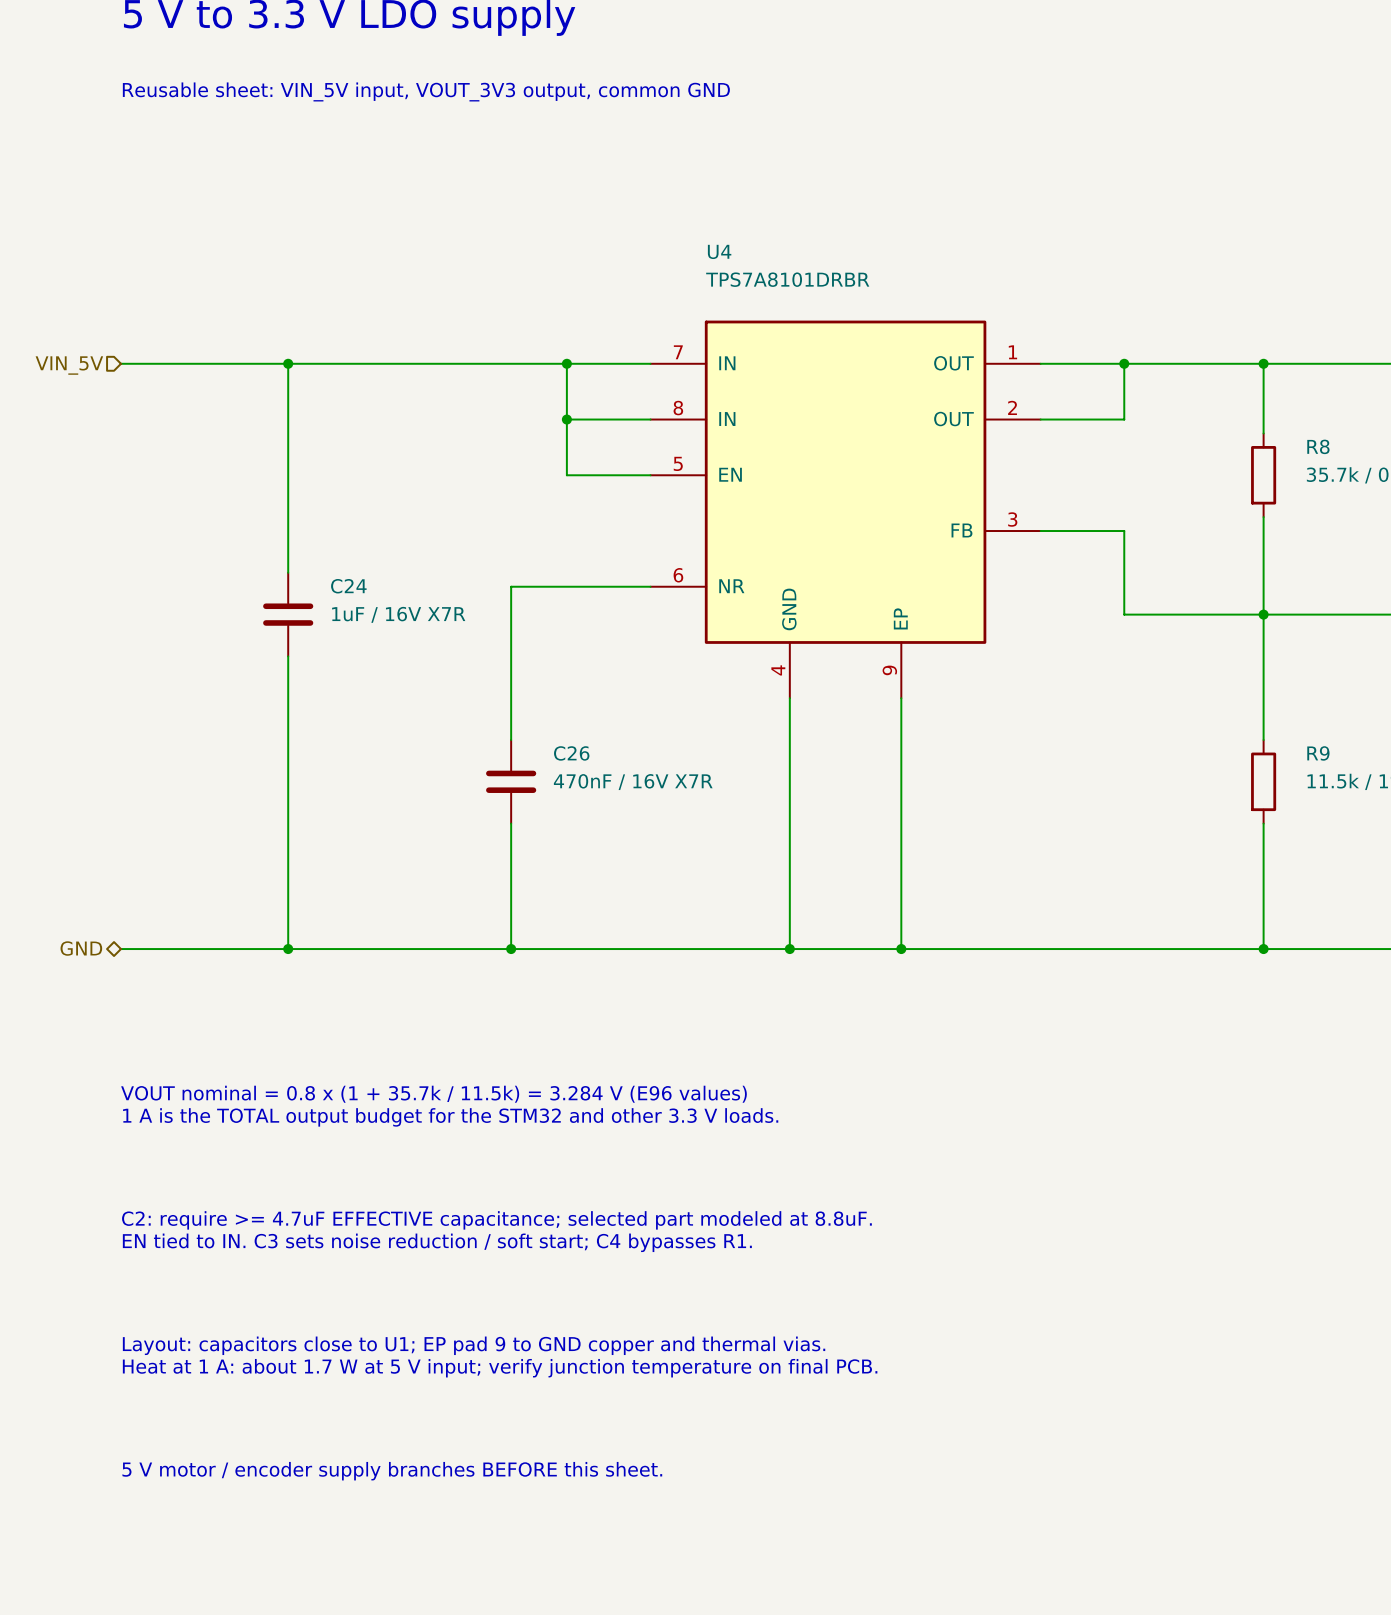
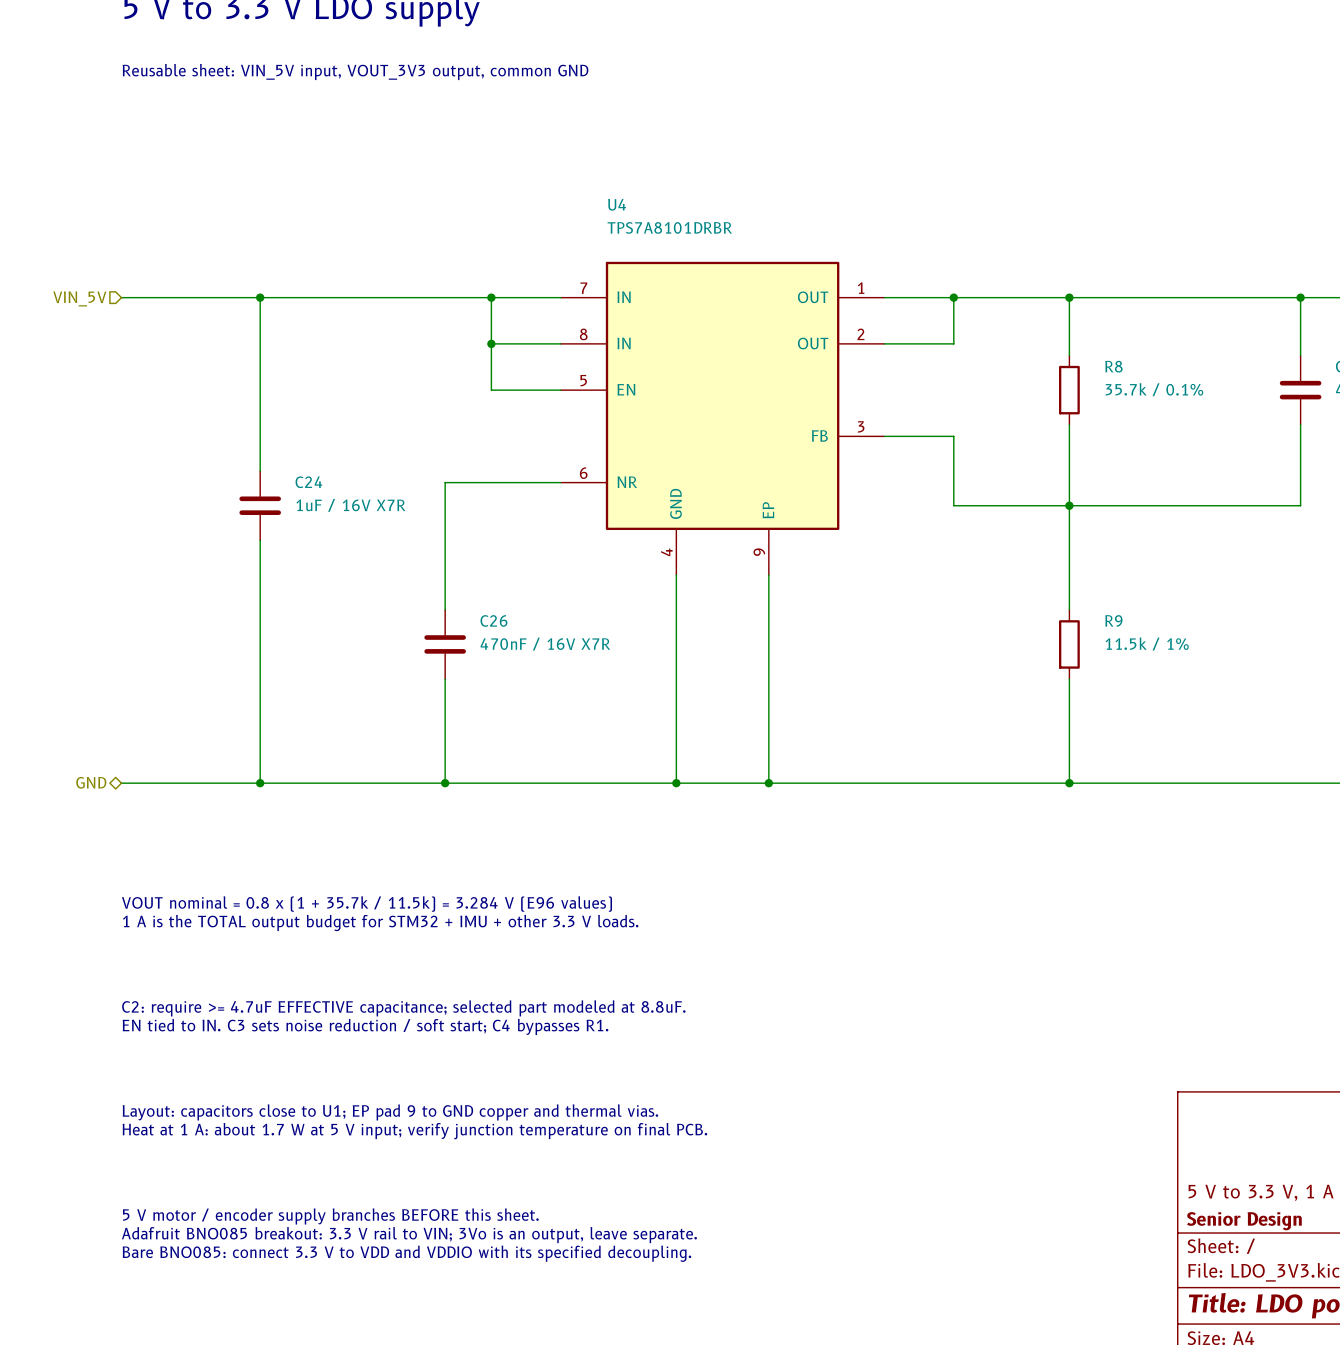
text: 1 A is the TOTAL output budget for the STM32 and other 3.3 V loads. (450, 1117) -> 1 A is the TOTAL output budget for STM32 + IMU + other 3.3 V loads. (380, 923)
text: none -> Adafruit BNO085 breakout: 3.3 V rail to VIN; 3Vo is an output, leave separate. (409, 1235)
text: none -> Bare BNO085: connect 3.3 V to VDD and VDDIO with its specified decoupling. (406, 1253)

